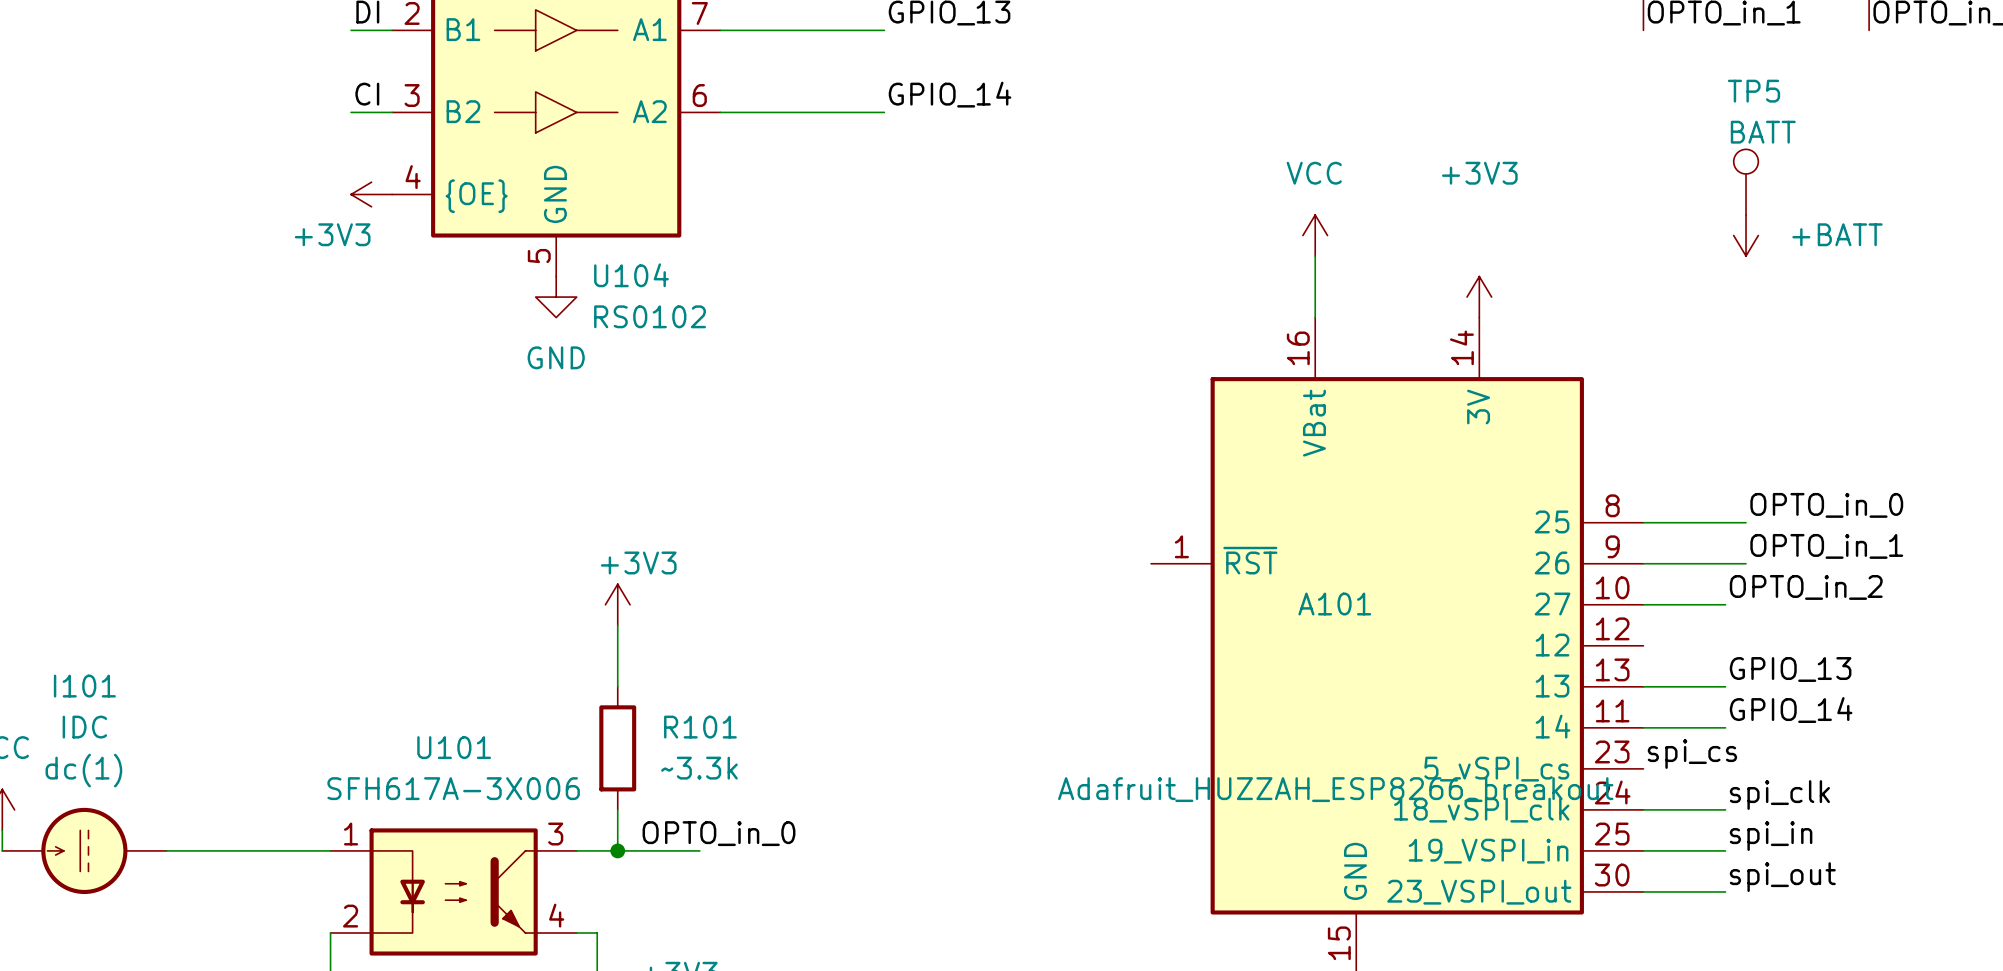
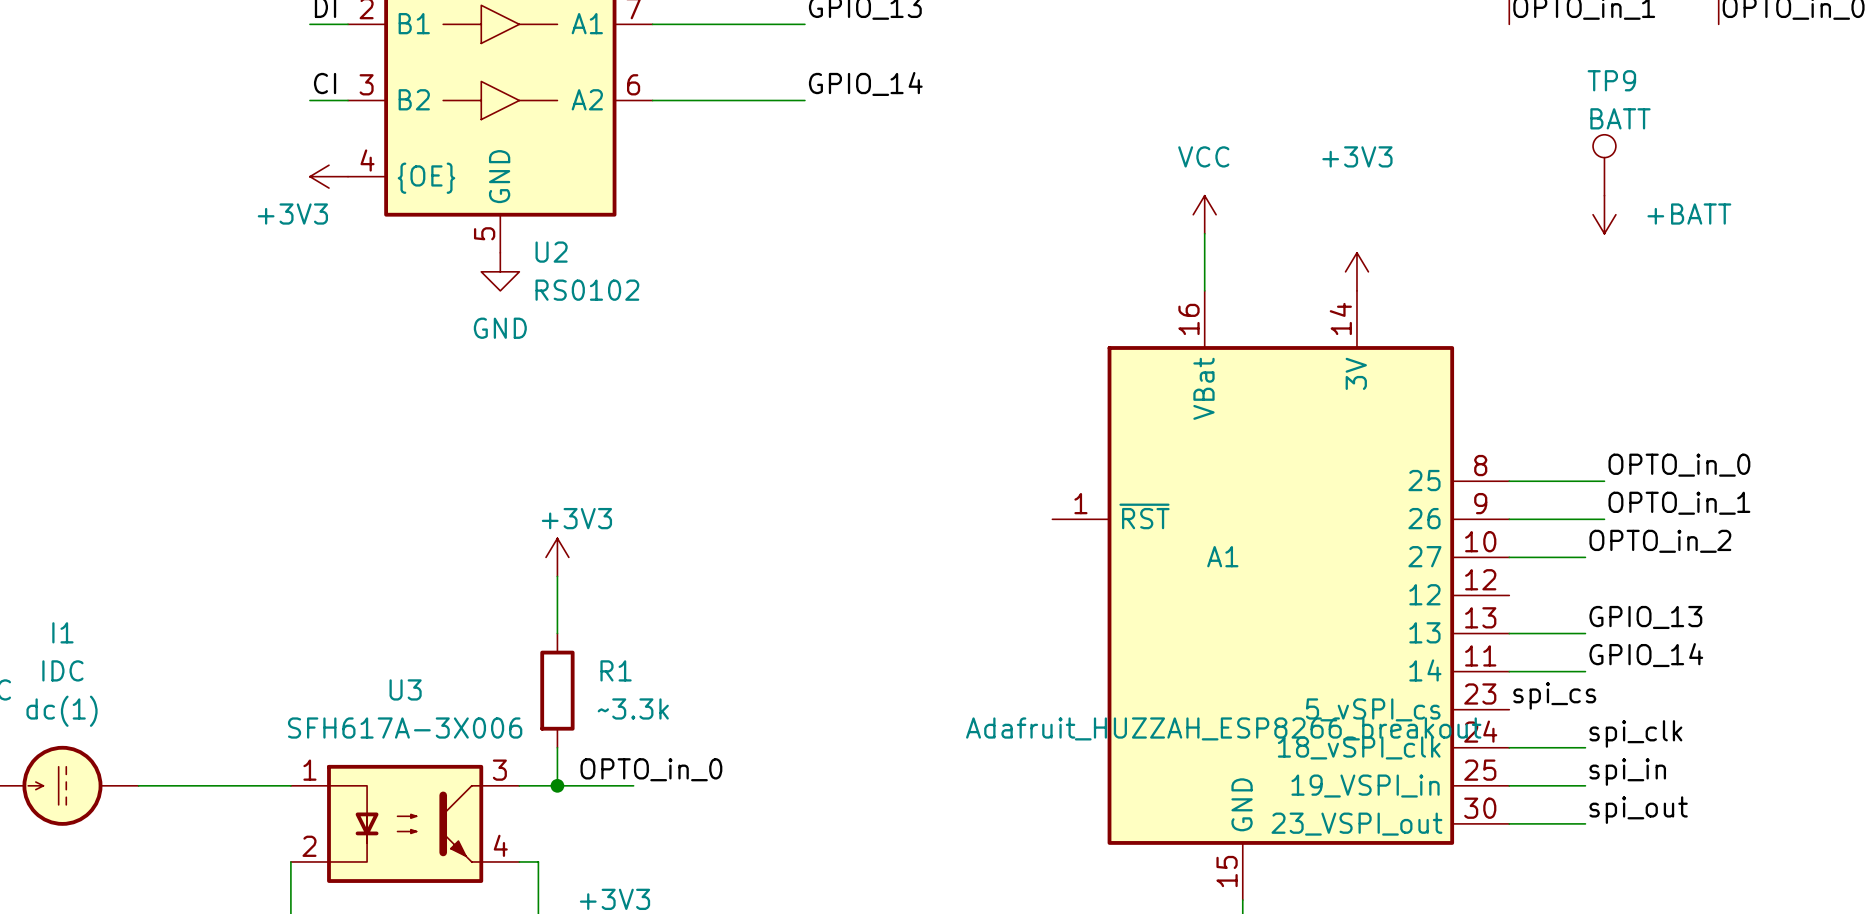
TP5 name: TP5 (1753, 91) -> TP9 (1611, 80)
U104 name: U104 (631, 275) -> U2 (551, 252)
A101 name: A101 (1334, 604) -> A1 (1222, 556)
I101 name: I101 (84, 686) -> I1 (62, 632)
R101 name: R101 (700, 727) -> R1 (616, 670)
U101 name: U101 (454, 747) -> U3 (405, 689)

